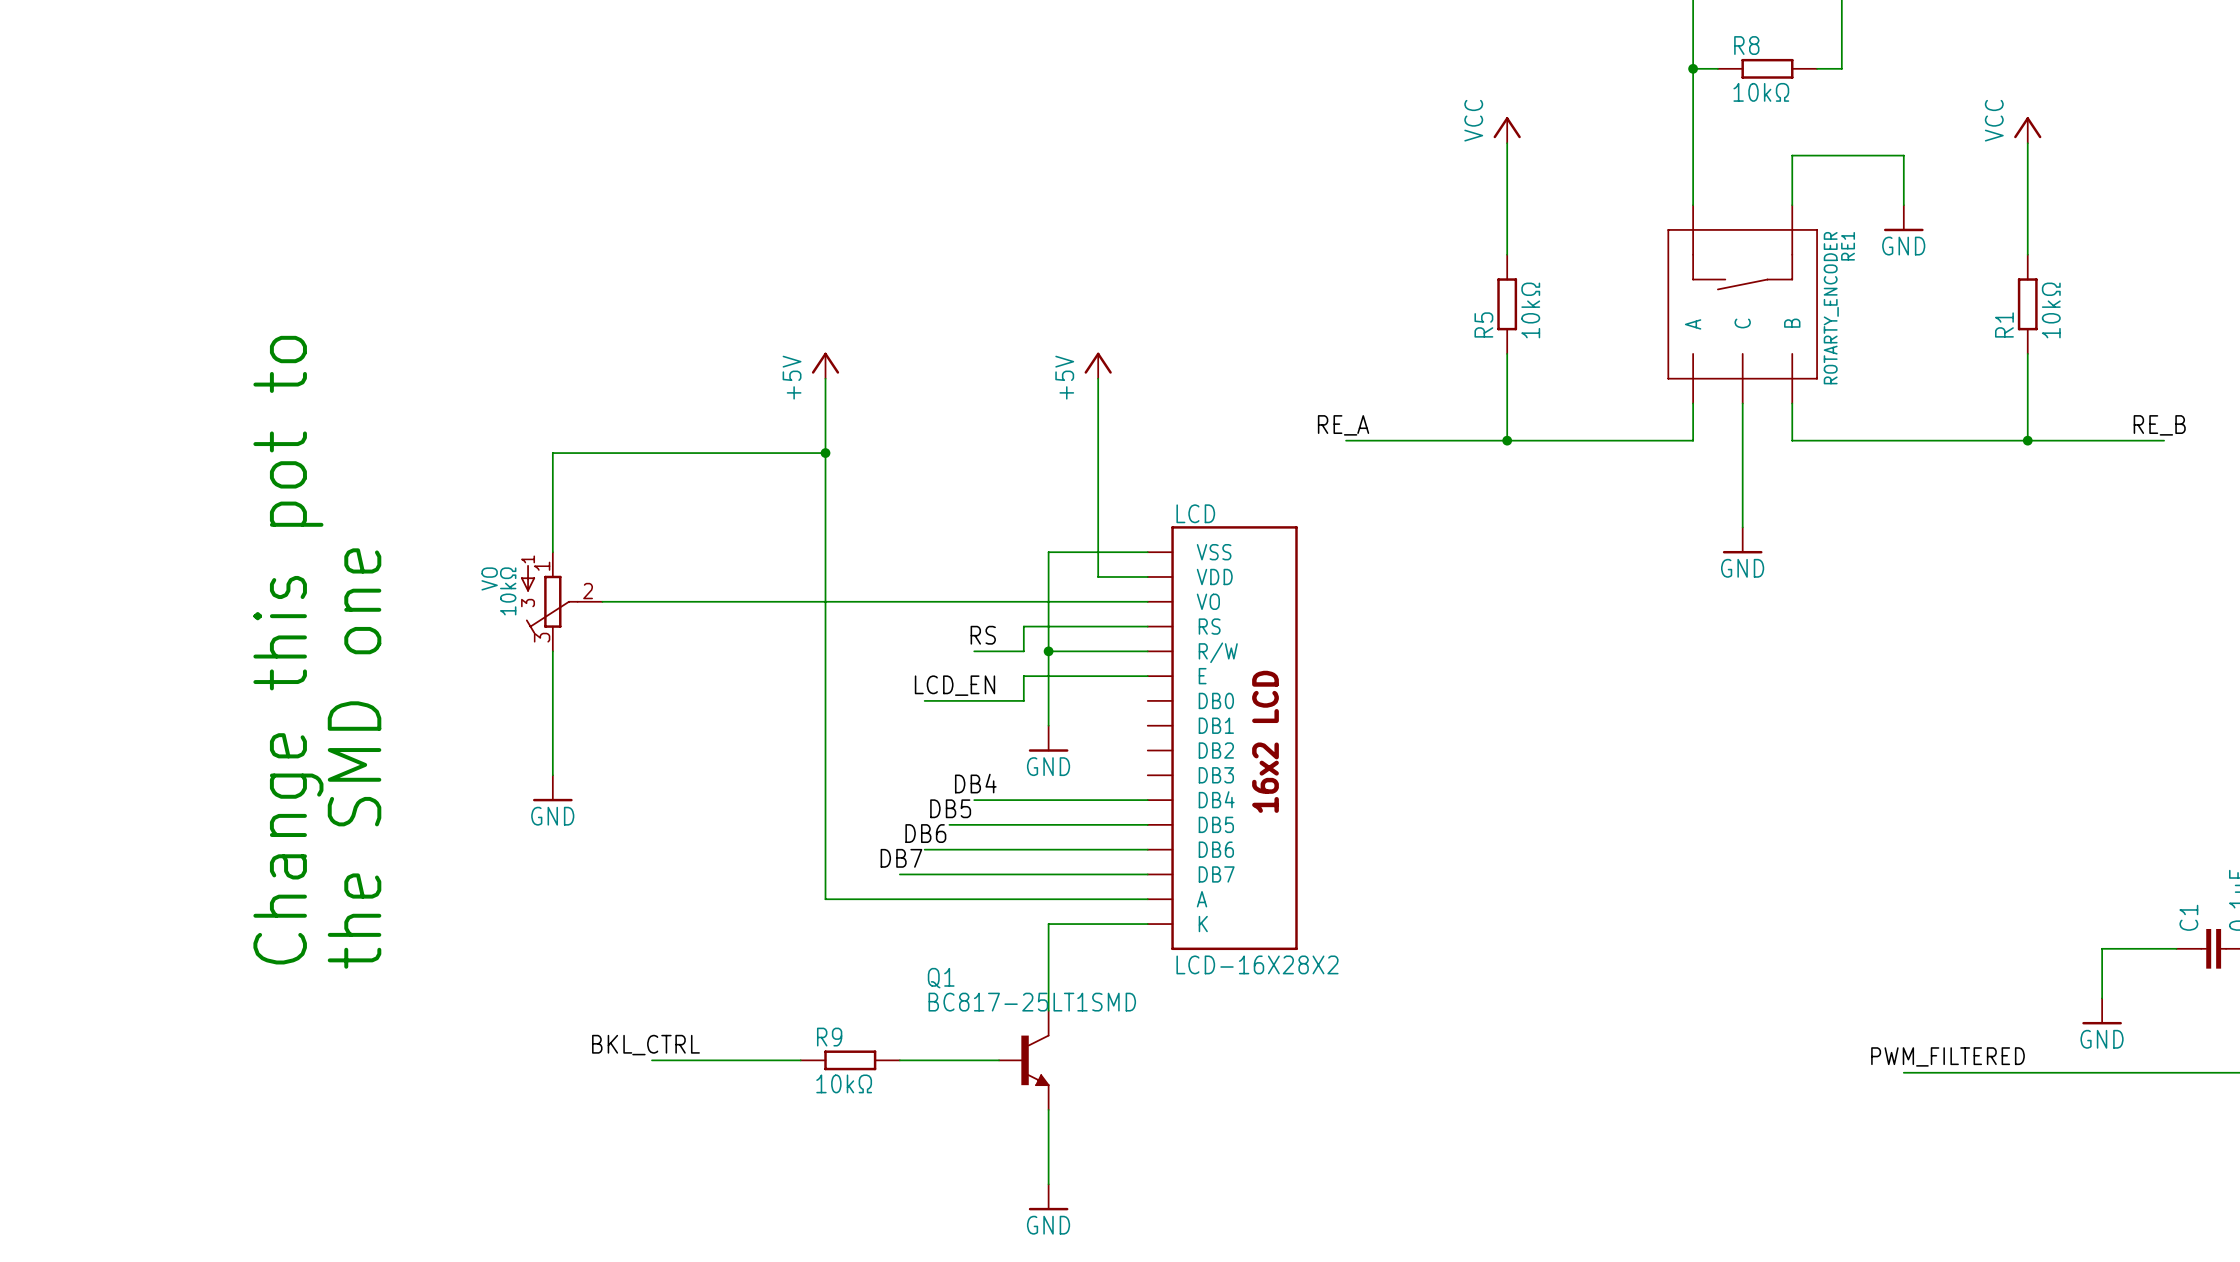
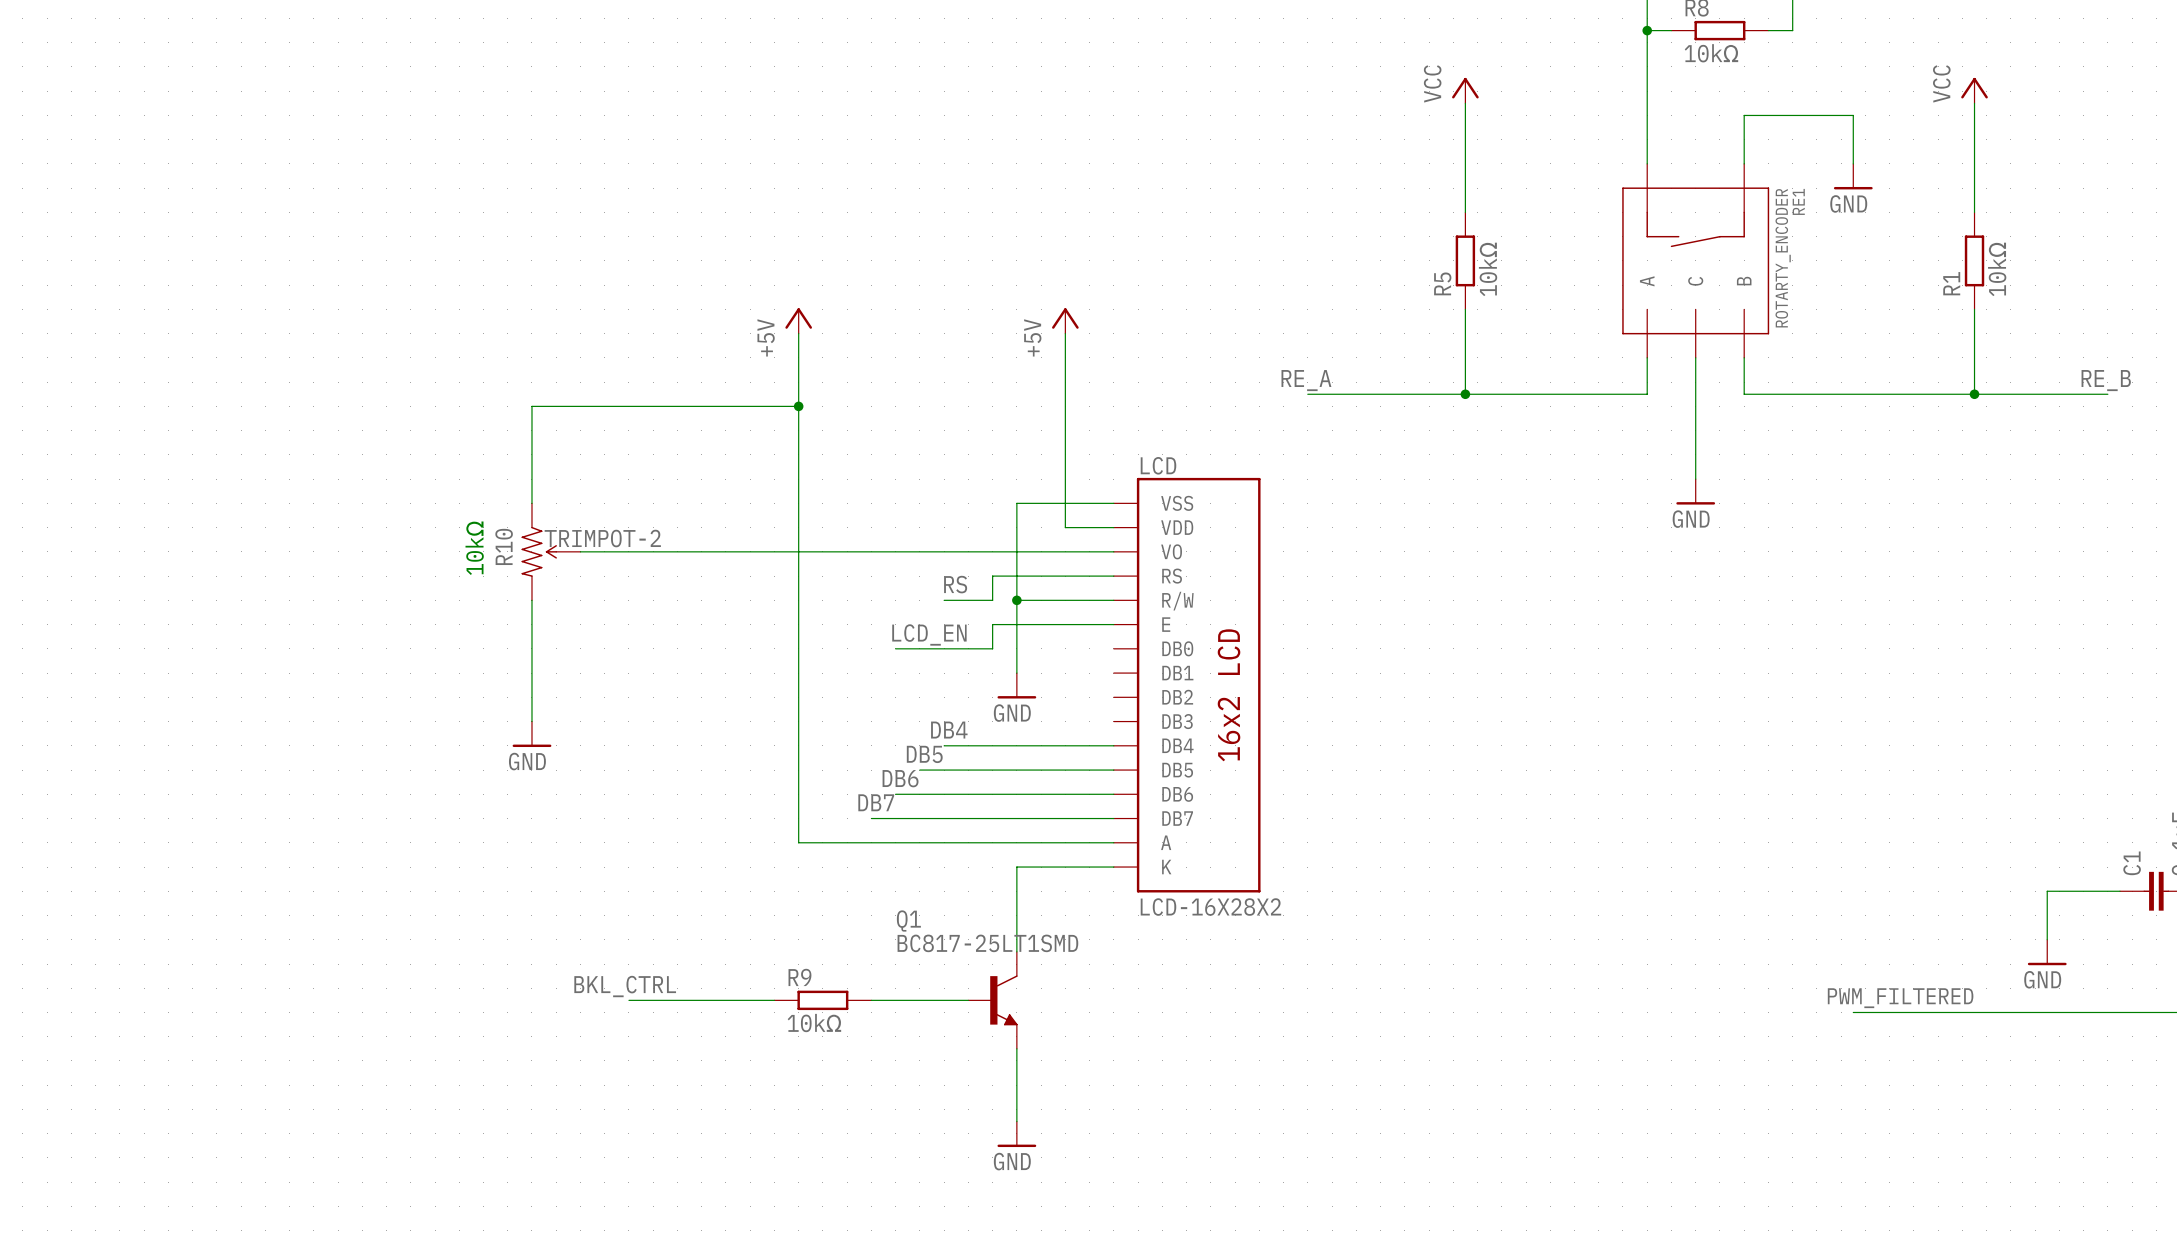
text: none -> 10kΩ (474, 548)
VO: 10kΩ (561, 601) -> none
R10: none -> TRIMPOT-2 (551, 551)
text: Change this pot to (288, 650) -> none
text: the SMD one (354, 758) -> none

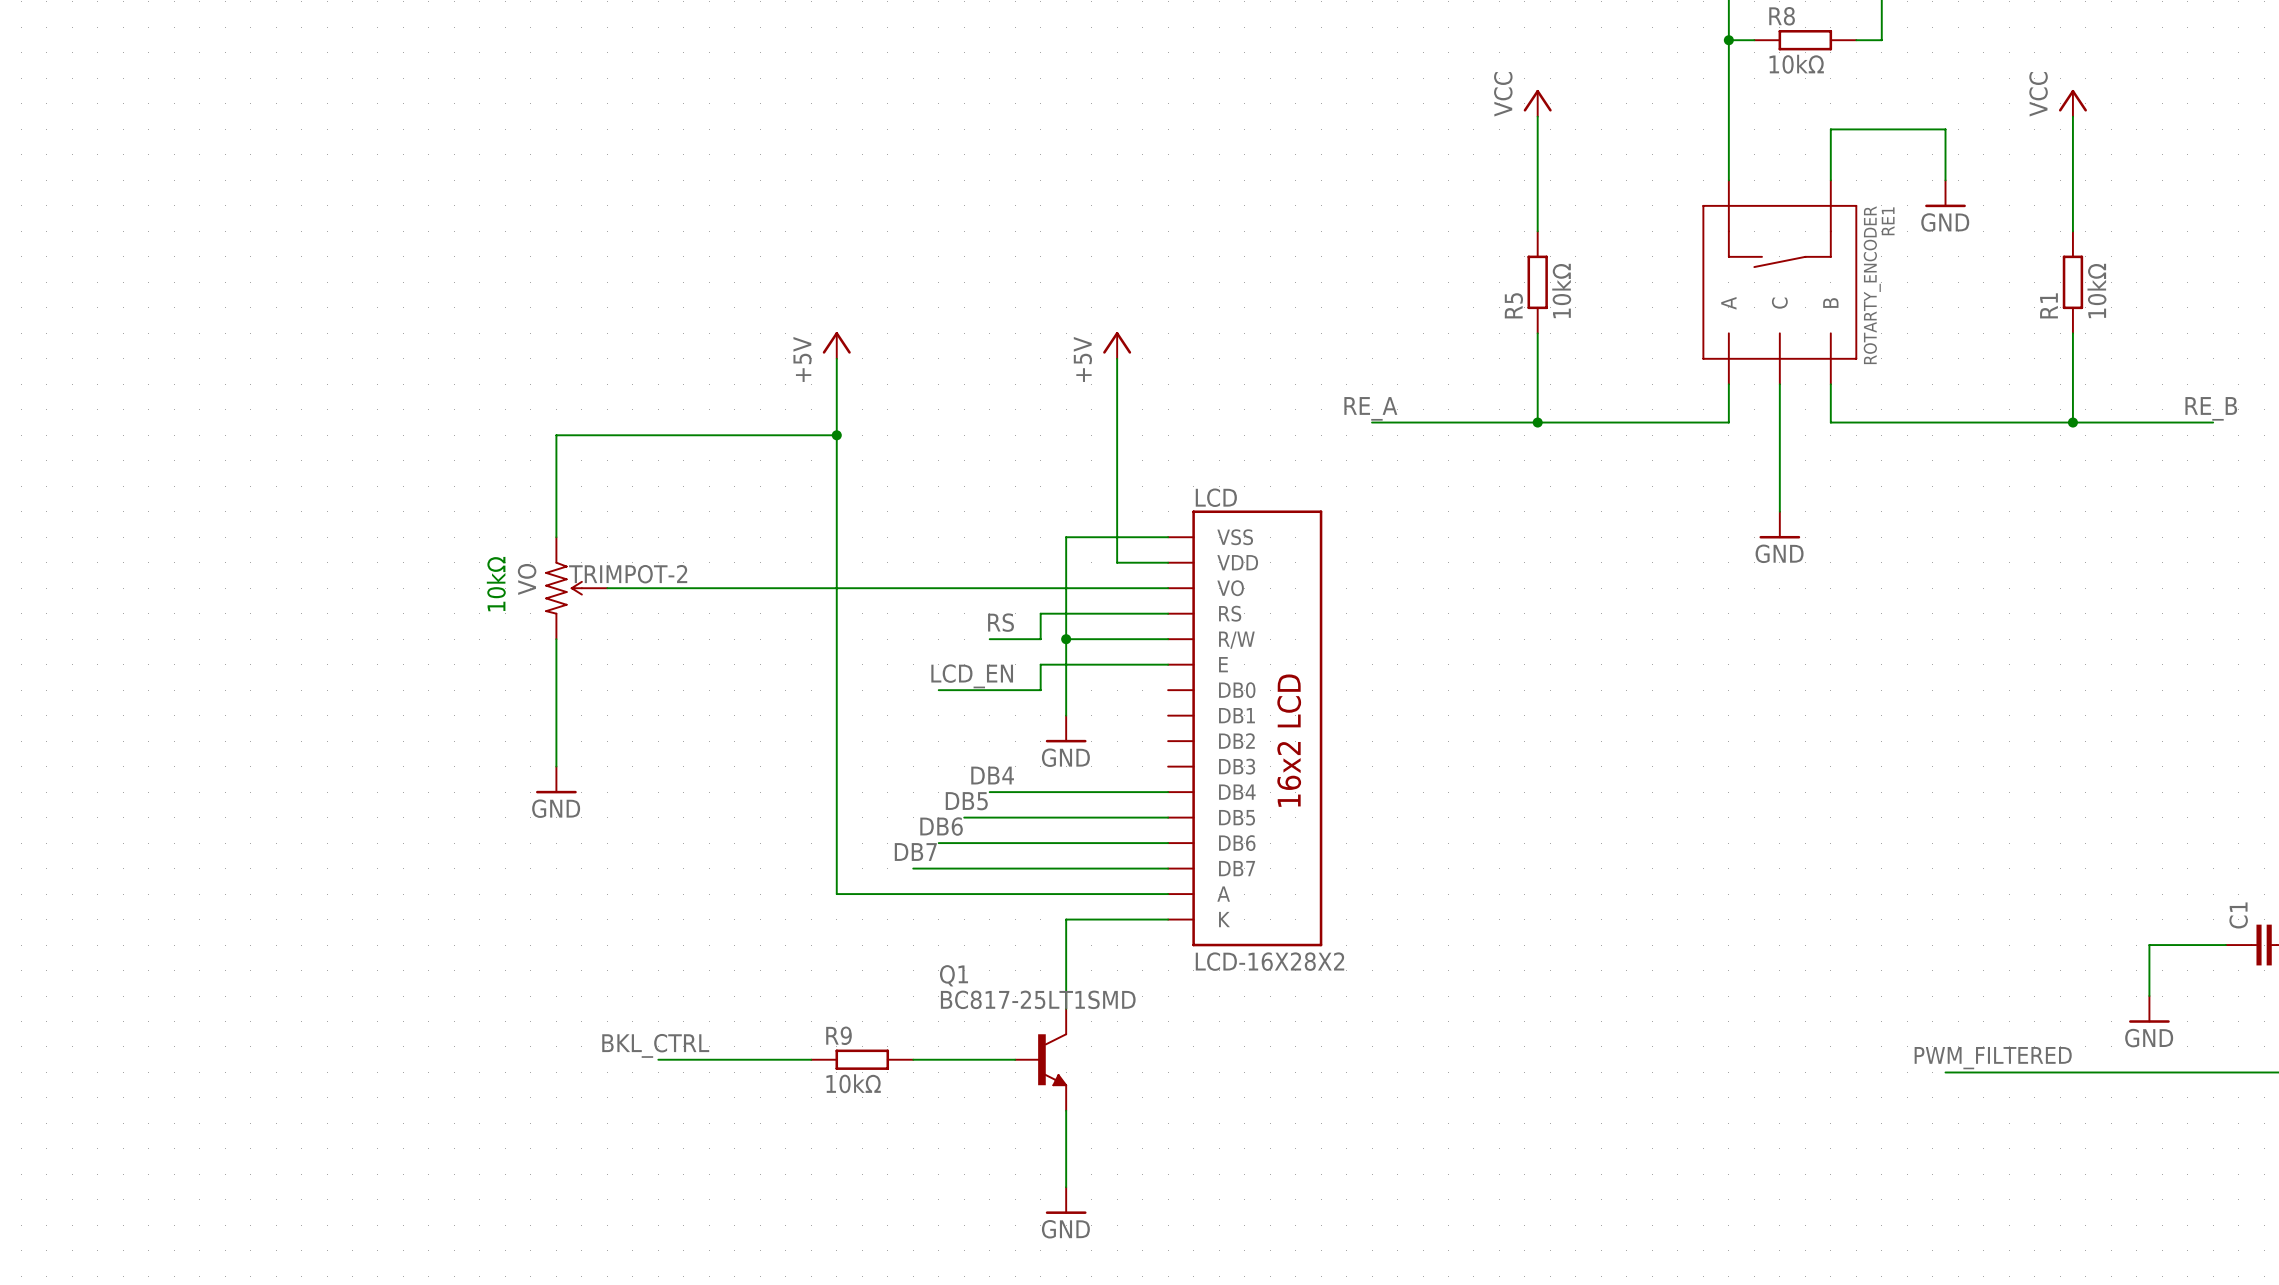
R10 name: R10 (504, 546) -> VO (527, 579)

